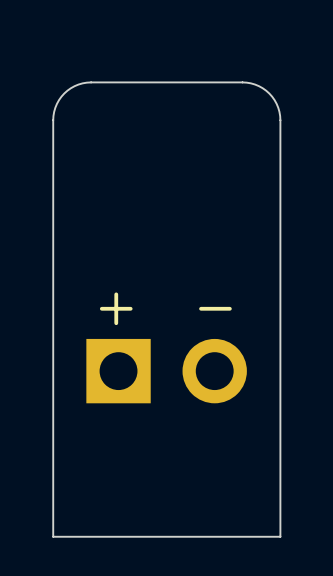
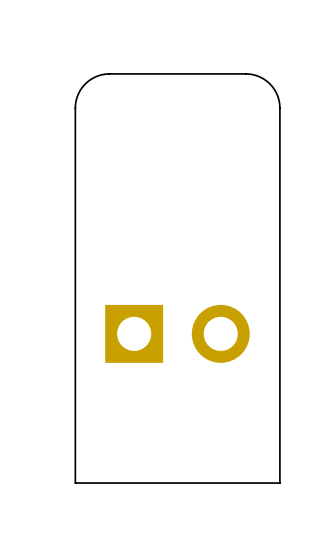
text: + (116, 308) -> none
text: - (215, 308) -> none

